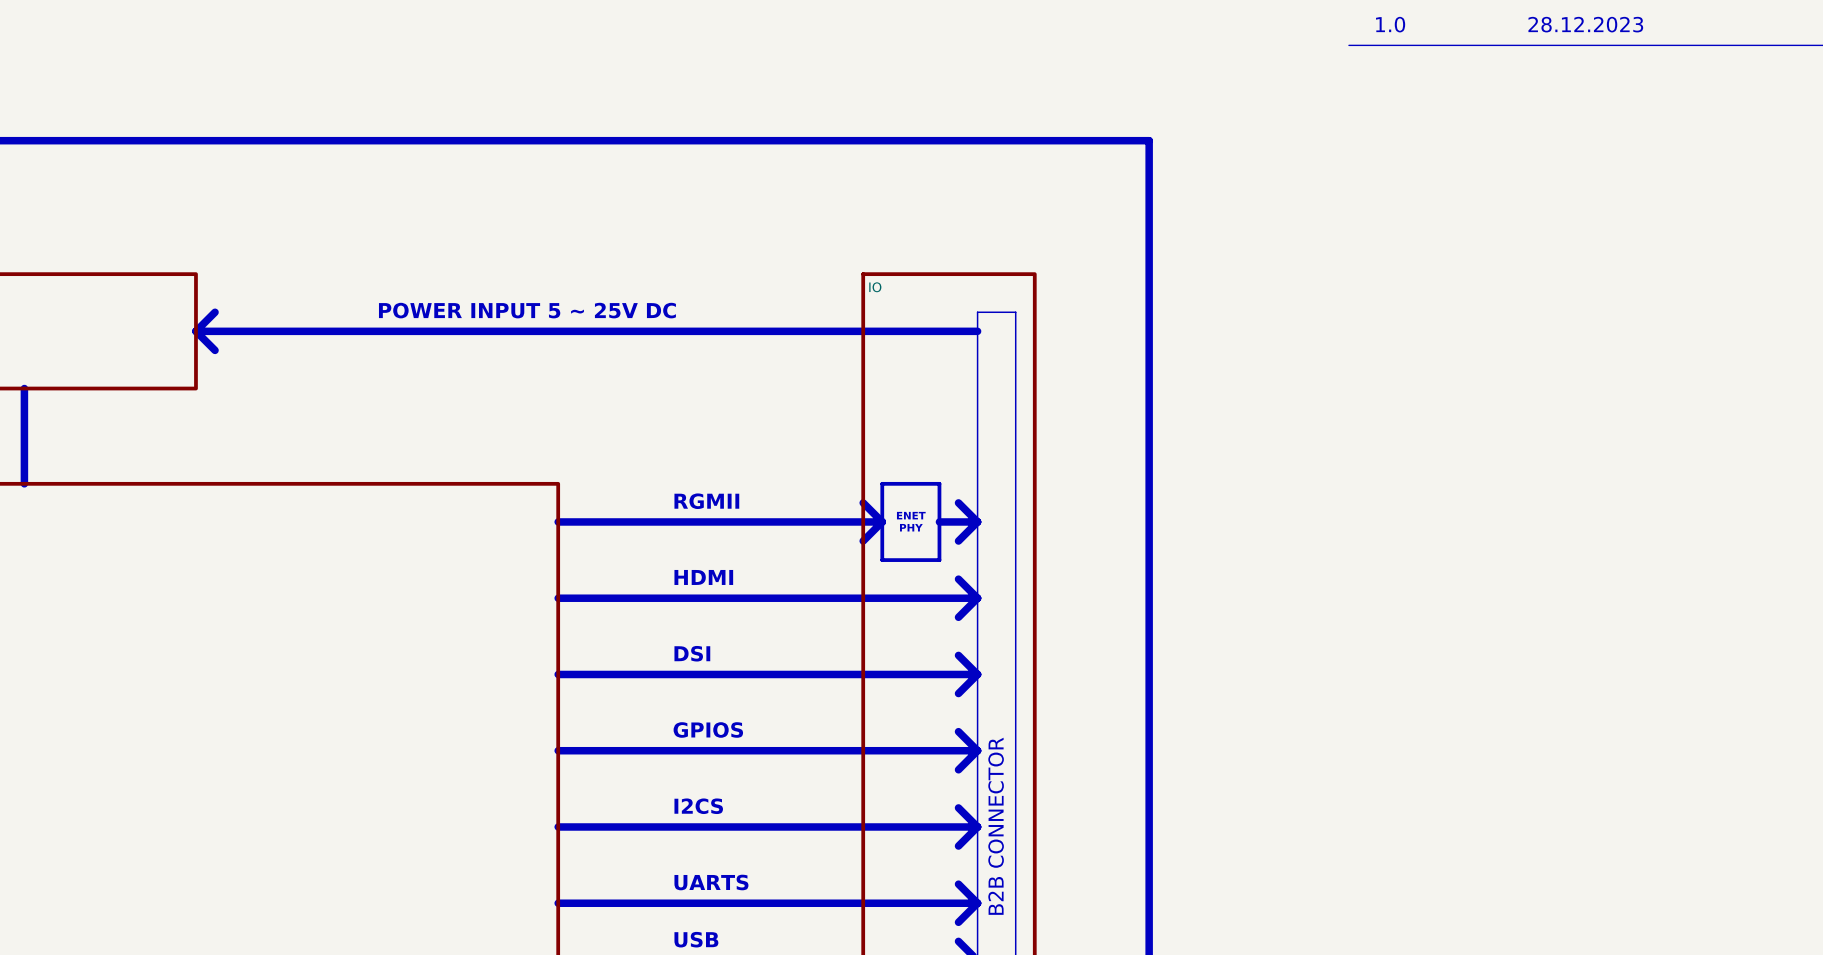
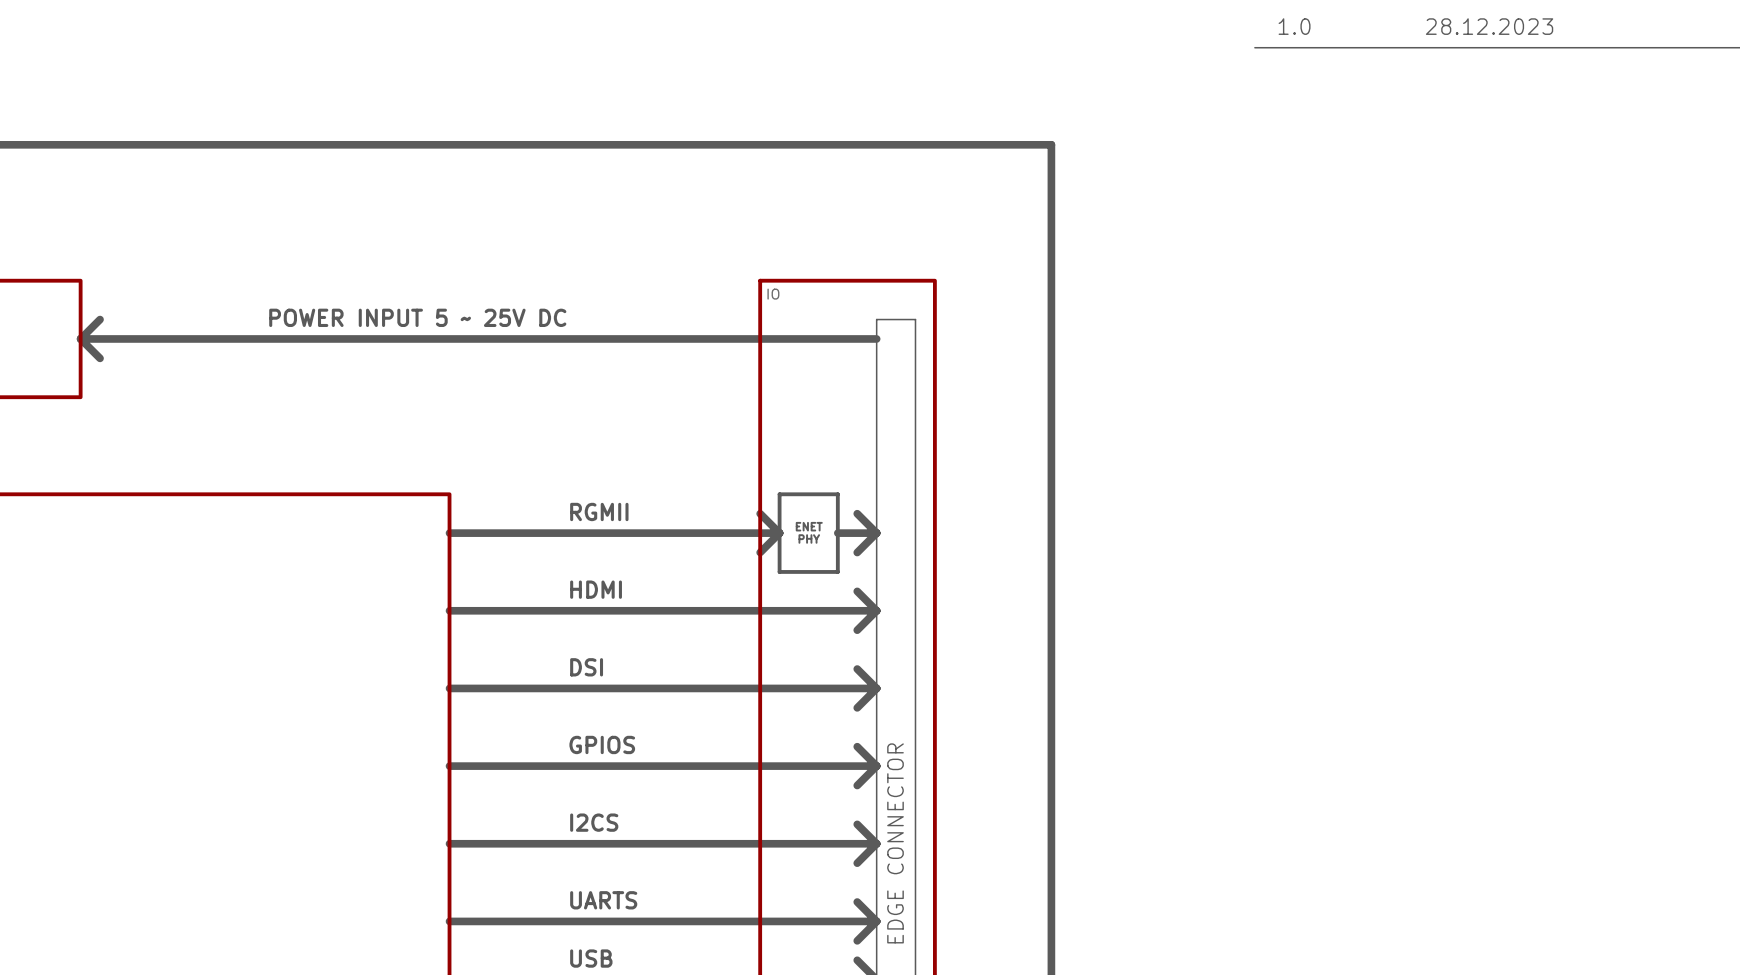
text: B2B CONNECTOR (996, 826) -> EDGE CONNECTOR (895, 843)

